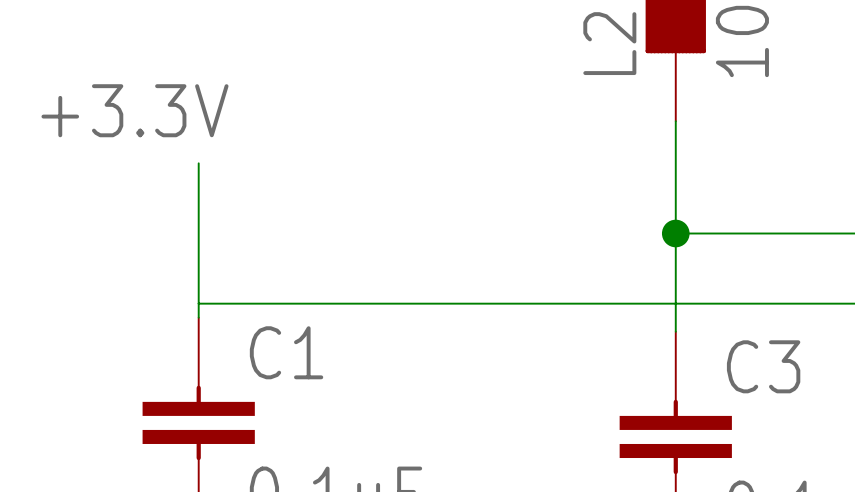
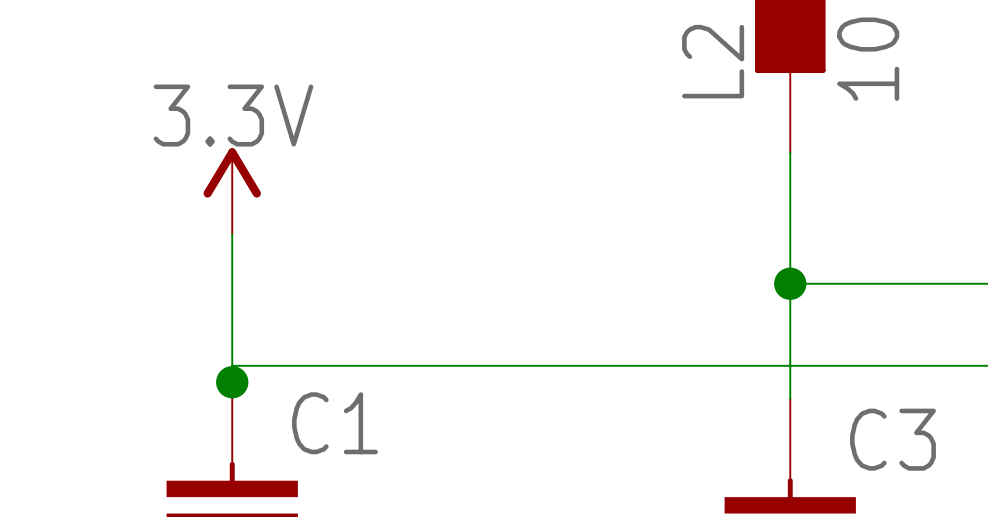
label: +3.3V (134, 110) -> none
power symbol: none -> 3.3V (232, 191)
junction: none -> (232, 382)

